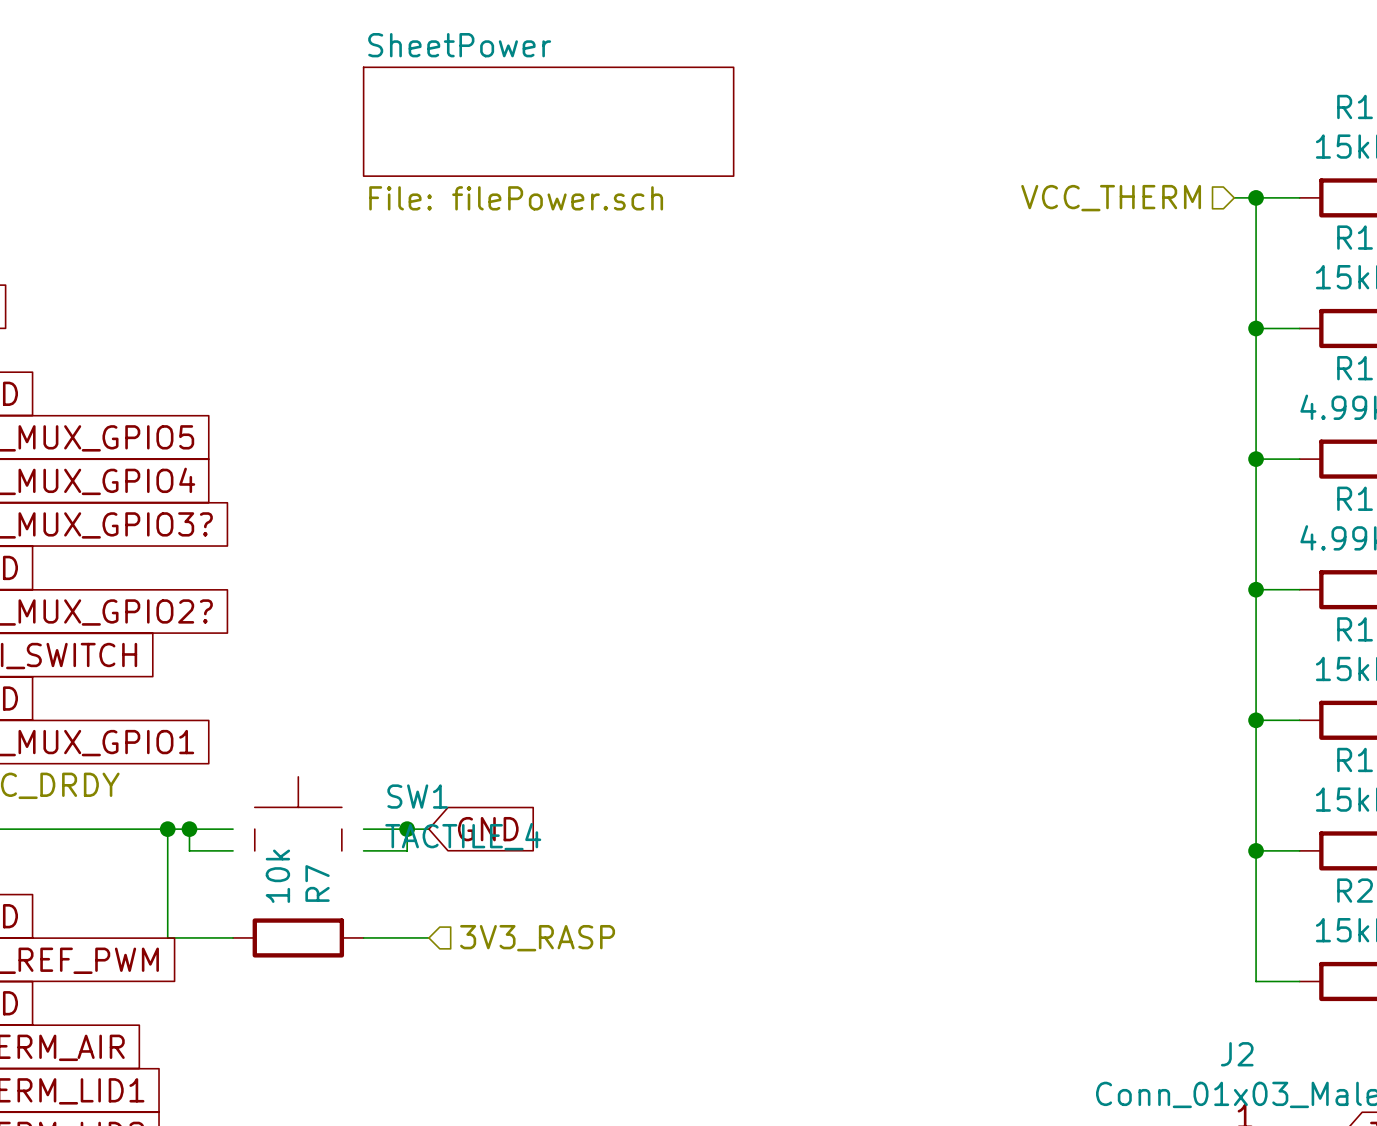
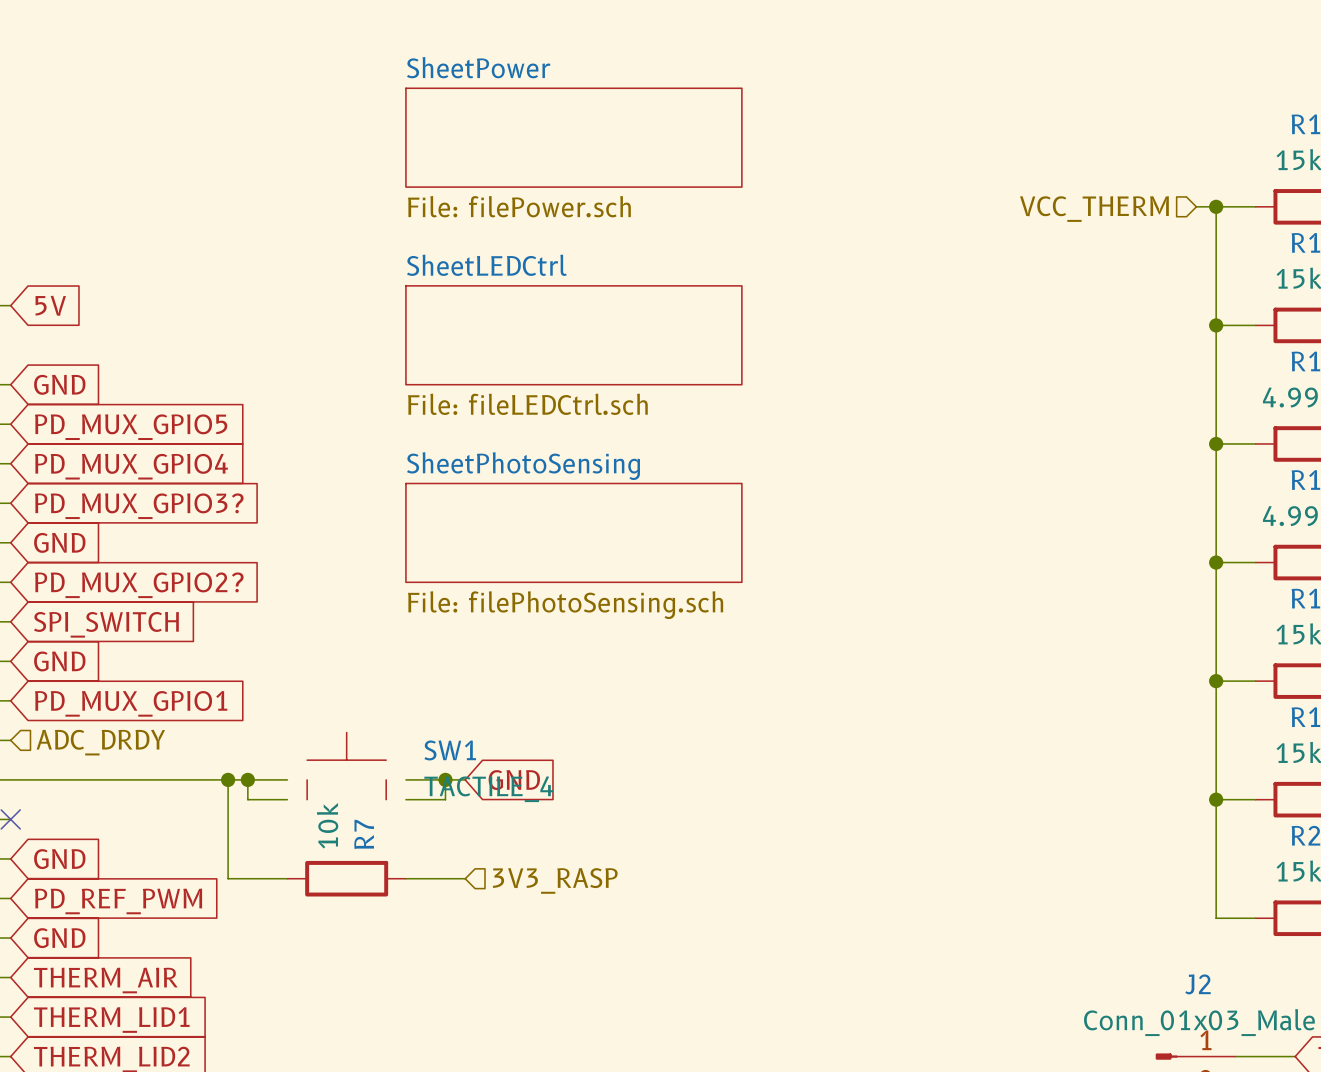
sheet SheetLEDCtrl: none -> File: fileLEDCtrl.sch (573, 335)
sheet SheetPhotoSensing: none -> File: filePhotoSensing.sch (573, 532)

